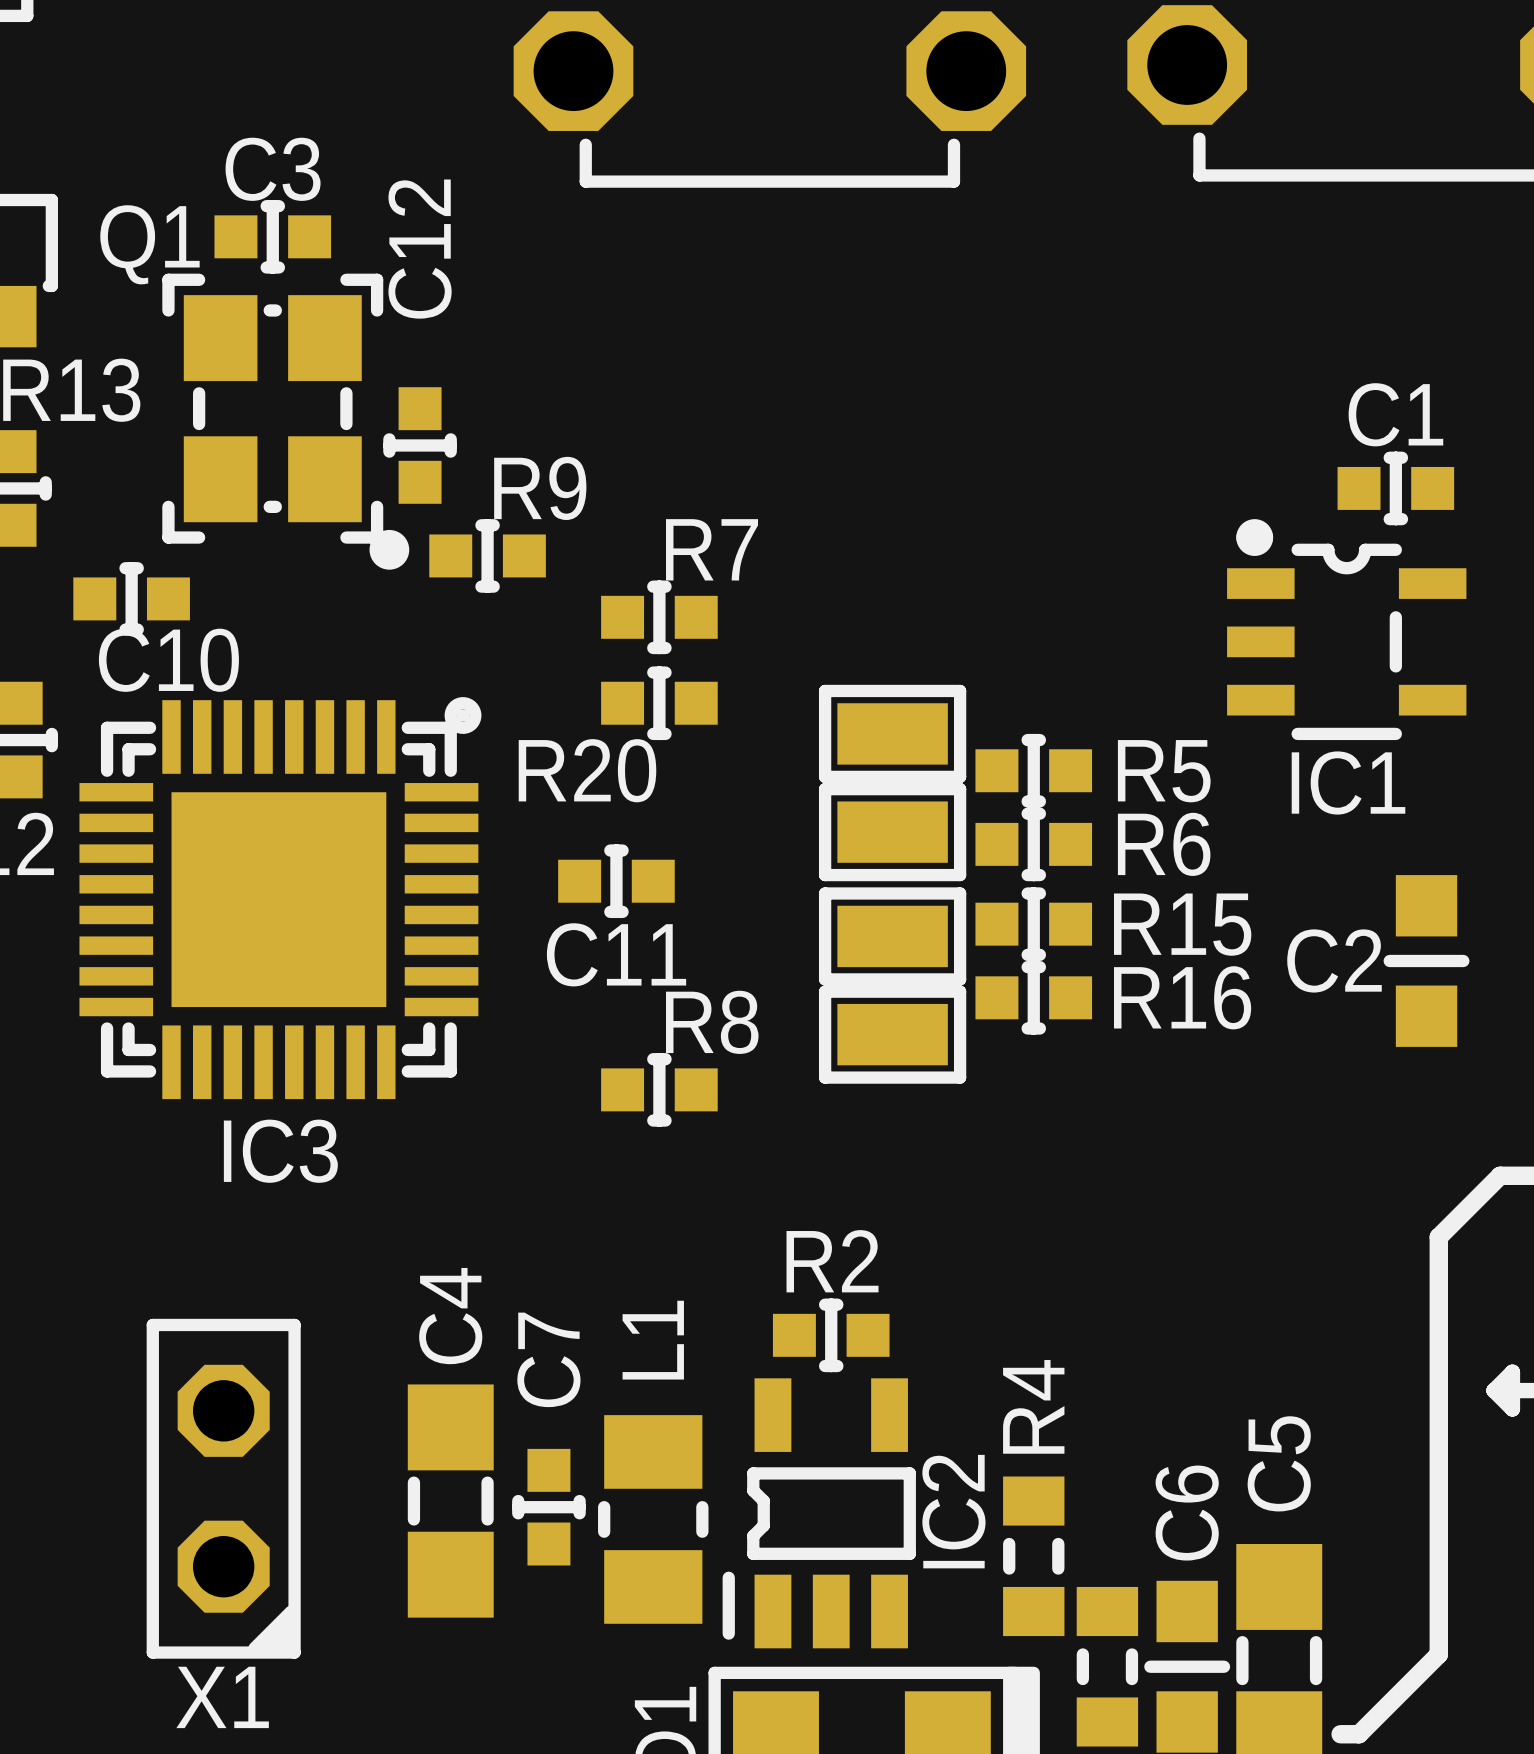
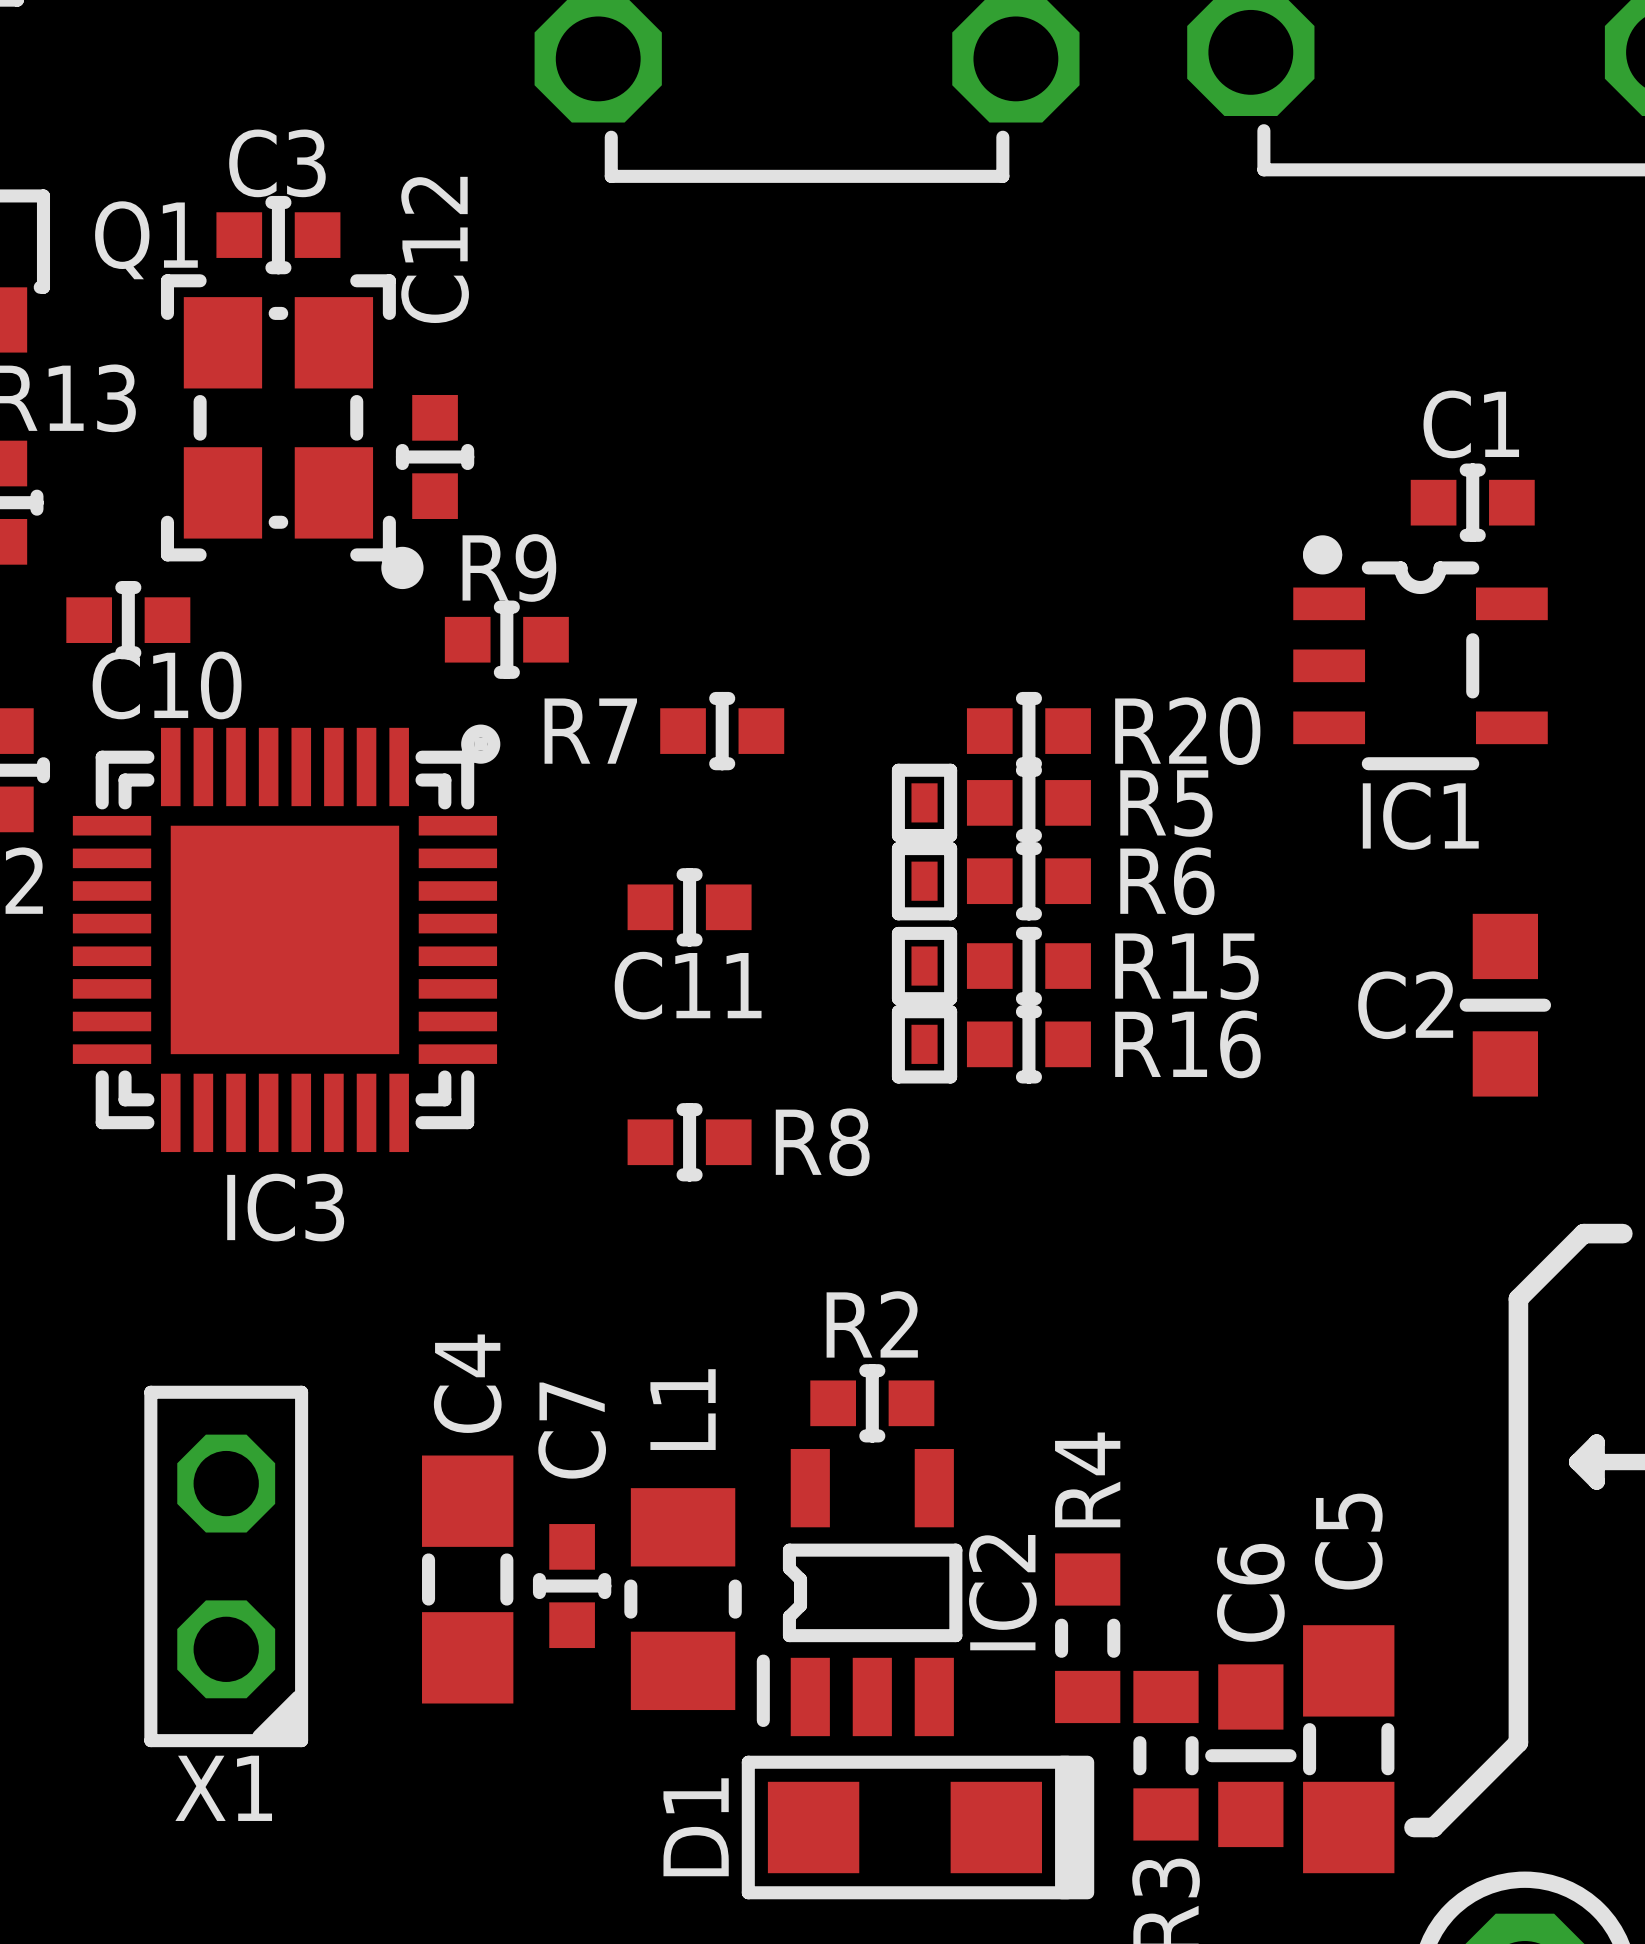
R9 name position: R9 (540, 488) -> R9 (509, 567)
R7 name position: R7 (712, 549) -> R7 (590, 731)
R9 position: (487, 555) -> (506, 639)
R7 position: (659, 617) -> (722, 731)
R20 position: (659, 703) -> (1028, 731)
part: (892, 733) -> none
R20 name position: R20 (587, 770) -> R20 (1187, 731)
part: none -> (924, 802)
R5 position: (1033, 770) -> (1028, 802)
part footprint: [818, 783, 967, 882] -> [891, 842, 958, 921]
R6 position: (1033, 844) -> (1028, 881)
C11 position: (616, 881) -> (689, 907)
part footprint: [818, 887, 967, 986] -> [891, 926, 958, 1006]
R15 position: (1033, 924) -> (1028, 966)
part: none -> (924, 1044)
R16 position: (1033, 997) -> (1028, 1044)
R8 name position: R8 (712, 1022) -> R8 (822, 1142)
part: (892, 1034) -> none

